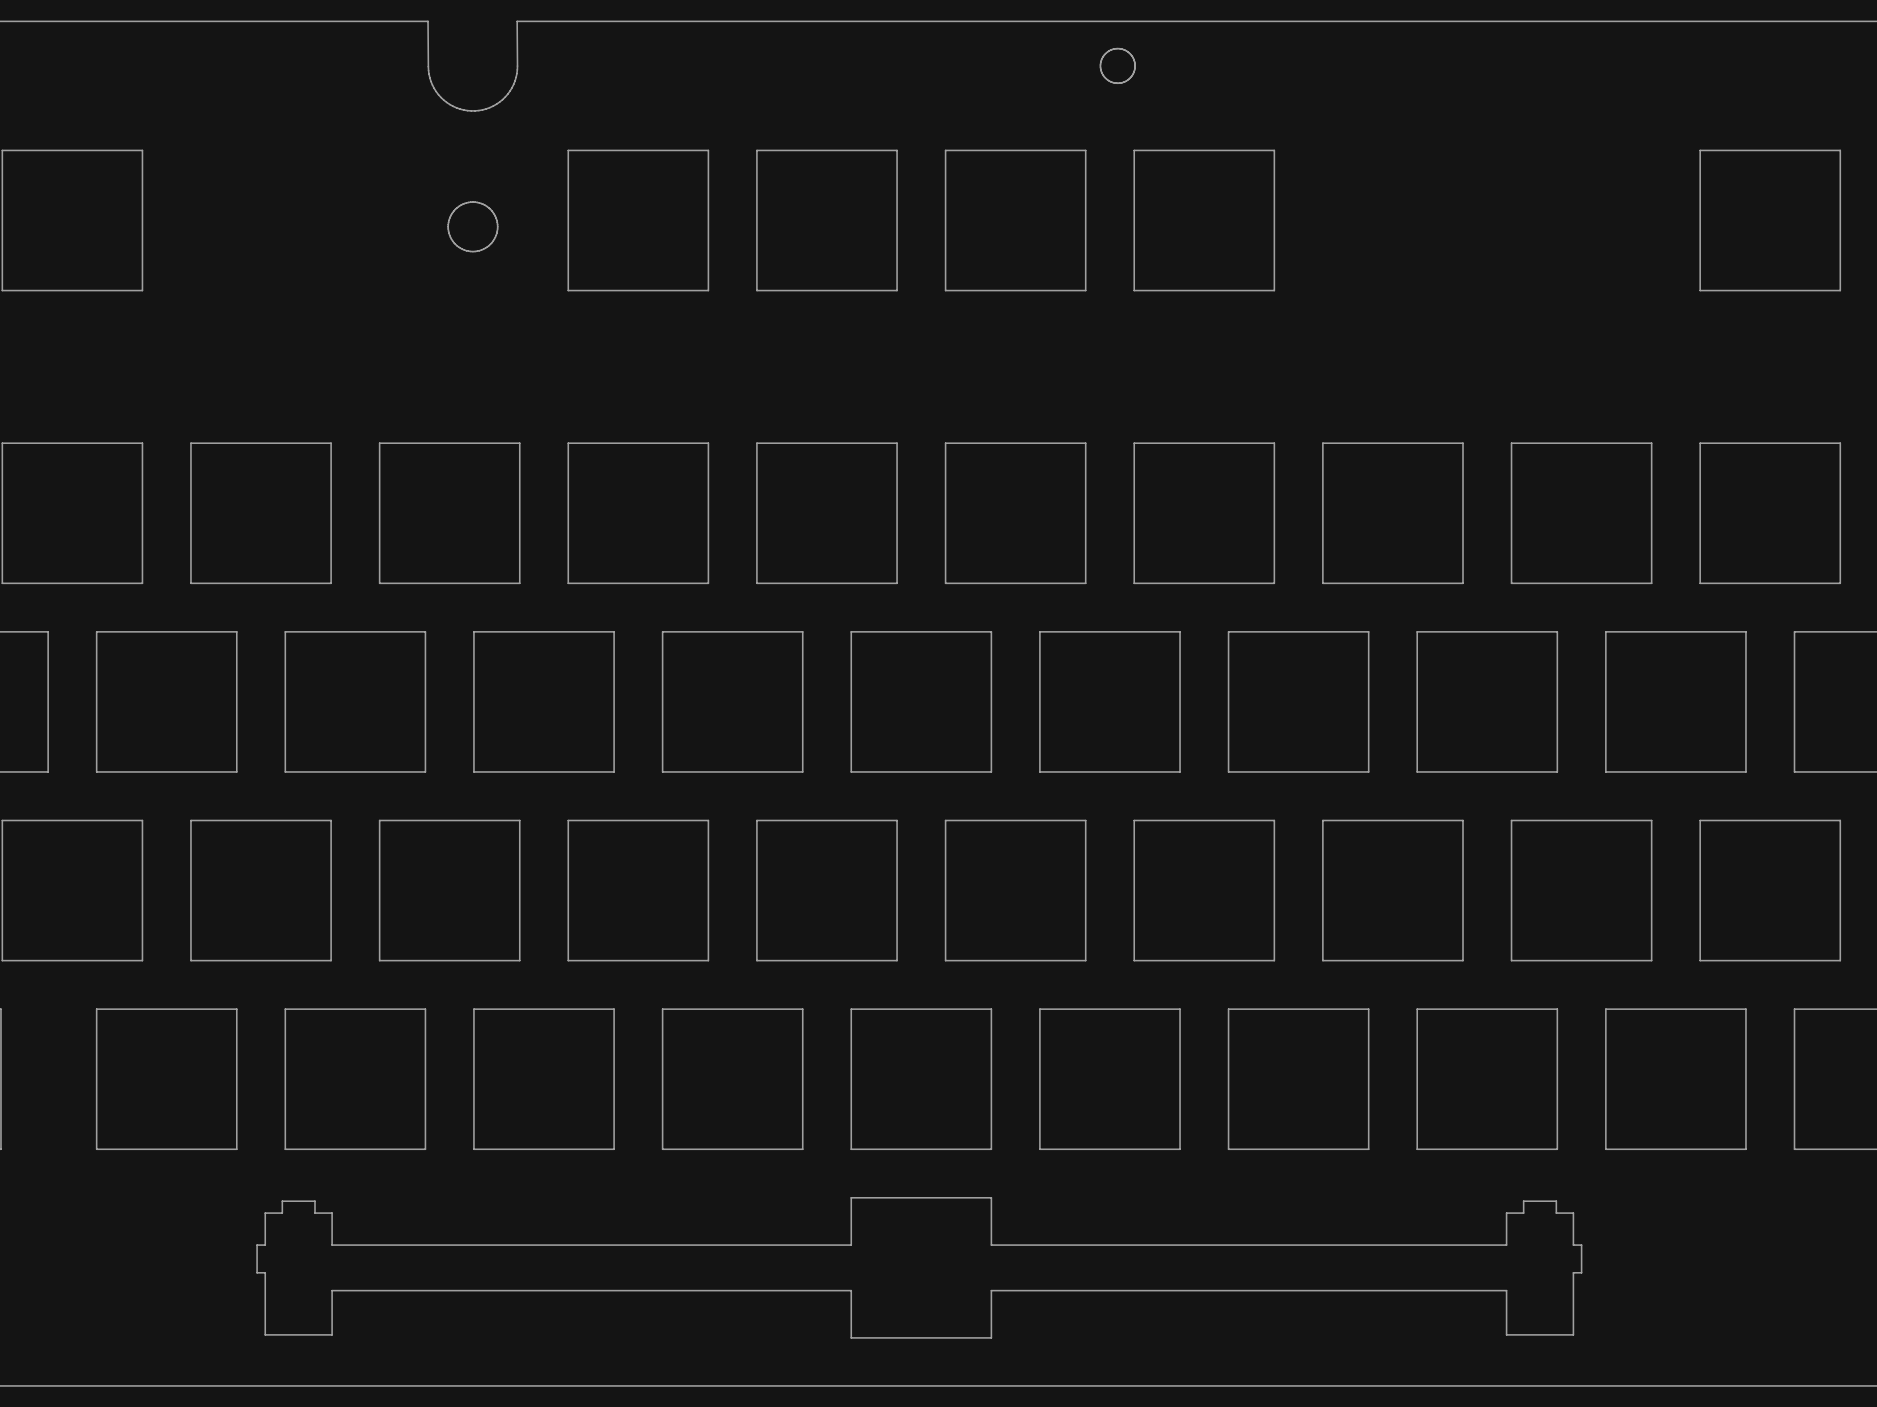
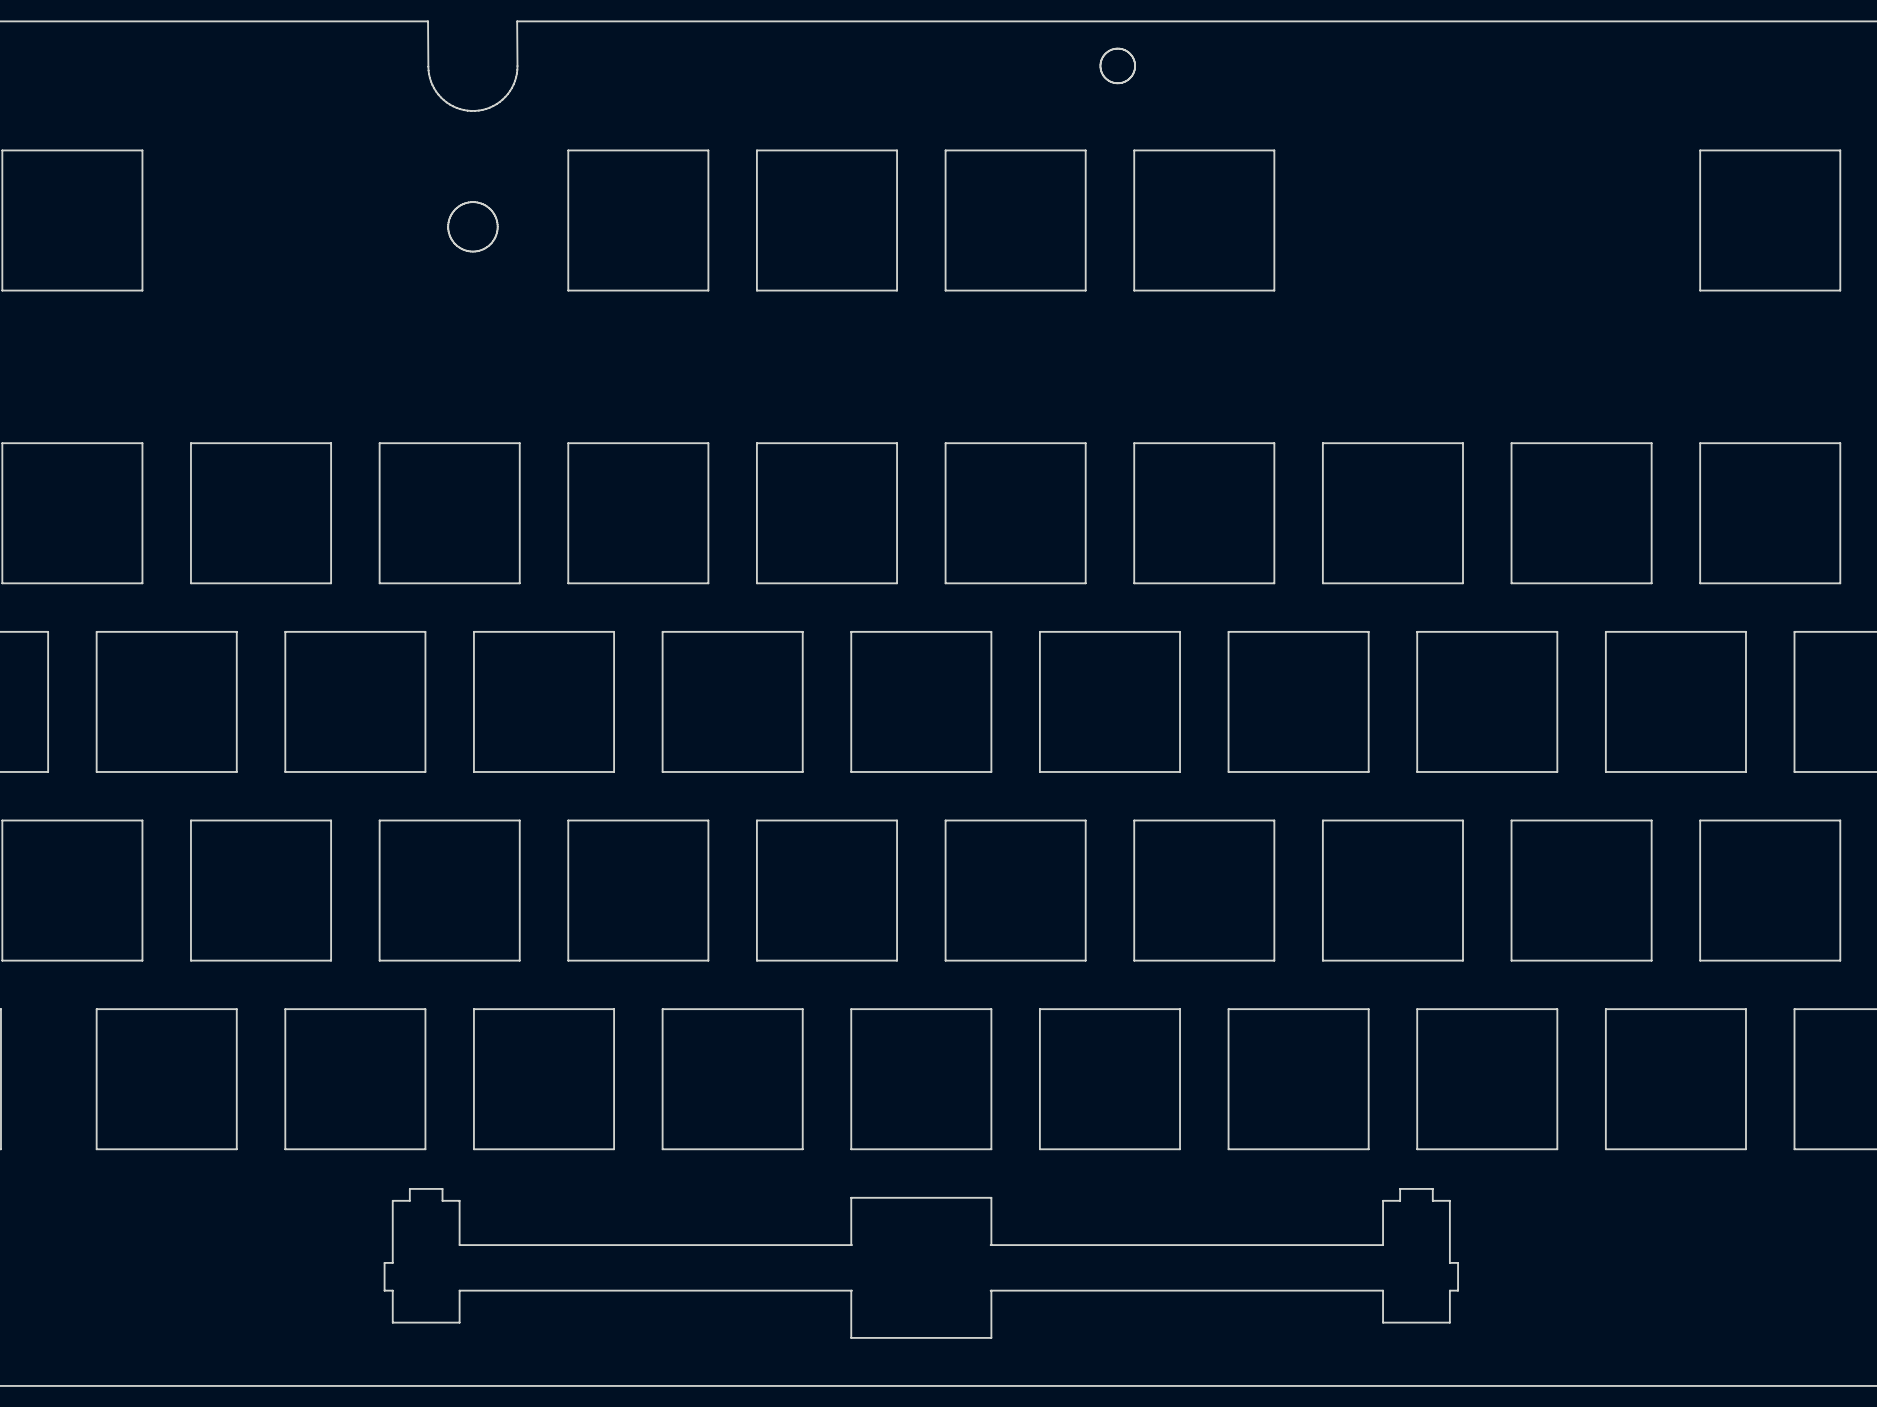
board edge: (459, 1245) (332, 1245) (332, 1213) (315, 1213) (315, 1201) (282, 1201) (282, 1213) (265, 1213) (265, 1245) (257, 1245) (257, 1272) (265, 1272) (265, 1334) (332, 1334) (332, 1290) (384, 1290) -> (459, 1245) (459, 1200) (442, 1200) (442, 1188) (409, 1188) (409, 1200) (392, 1200) (392, 1262) (384, 1262) (384, 1290)
board edge: (1383, 1245) (1506, 1245) (1506, 1213) (1523, 1213) (1523, 1201) (1556, 1201) (1556, 1213) (1573, 1213) (1573, 1245) (1581, 1245) (1581, 1272) (1573, 1272) (1573, 1334) (1506, 1334) (1506, 1290) (1458, 1290) -> (1383, 1245) (1383, 1200) (1400, 1200) (1400, 1188) (1432, 1188) (1432, 1200) (1449, 1200) (1449, 1262) (1458, 1262) (1458, 1290)
board edge: (459, 1290) (392, 1290) -> (459, 1290) (459, 1322) (392, 1322) (392, 1290)
board edge: (1449, 1290) (1383, 1290) -> (1449, 1290) (1449, 1322) (1383, 1322) (1383, 1290)

